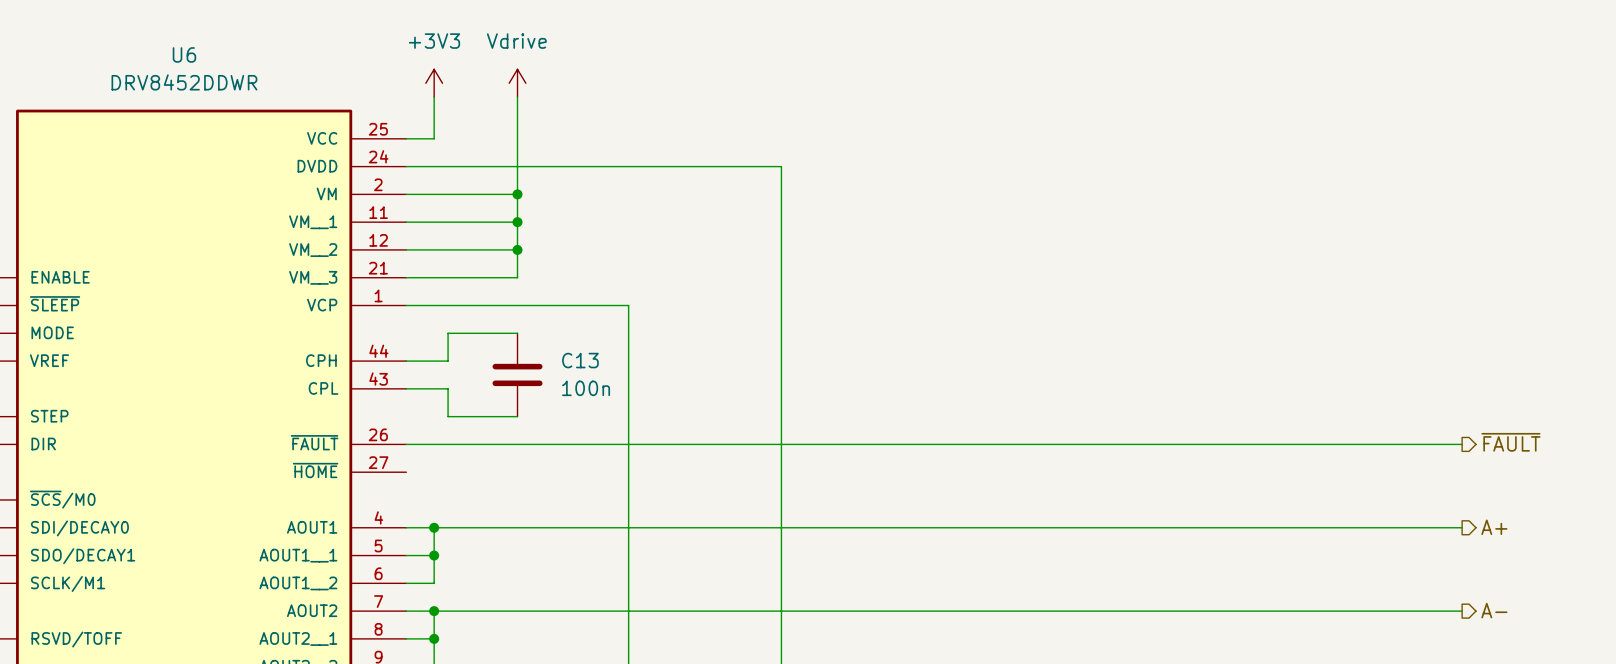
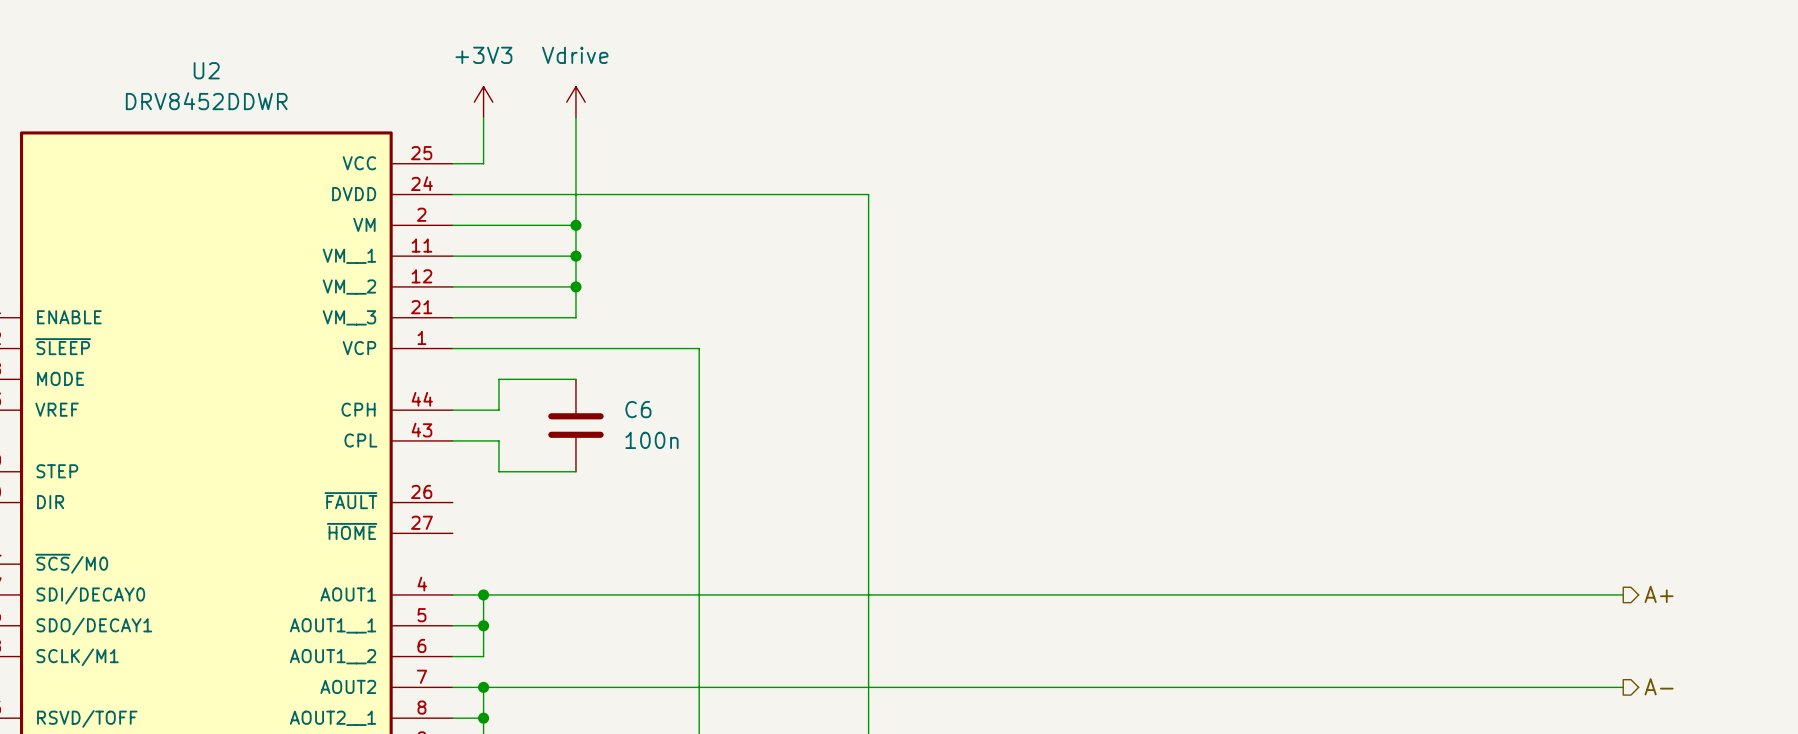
U6 name: U6 (184, 54) -> U2 (206, 70)
C13 name: C13 (580, 360) -> C6 (638, 409)
hierarchical label: ~{FAULT} (1510, 442) -> none
wire: (406, 444) (1462, 444) -> none

